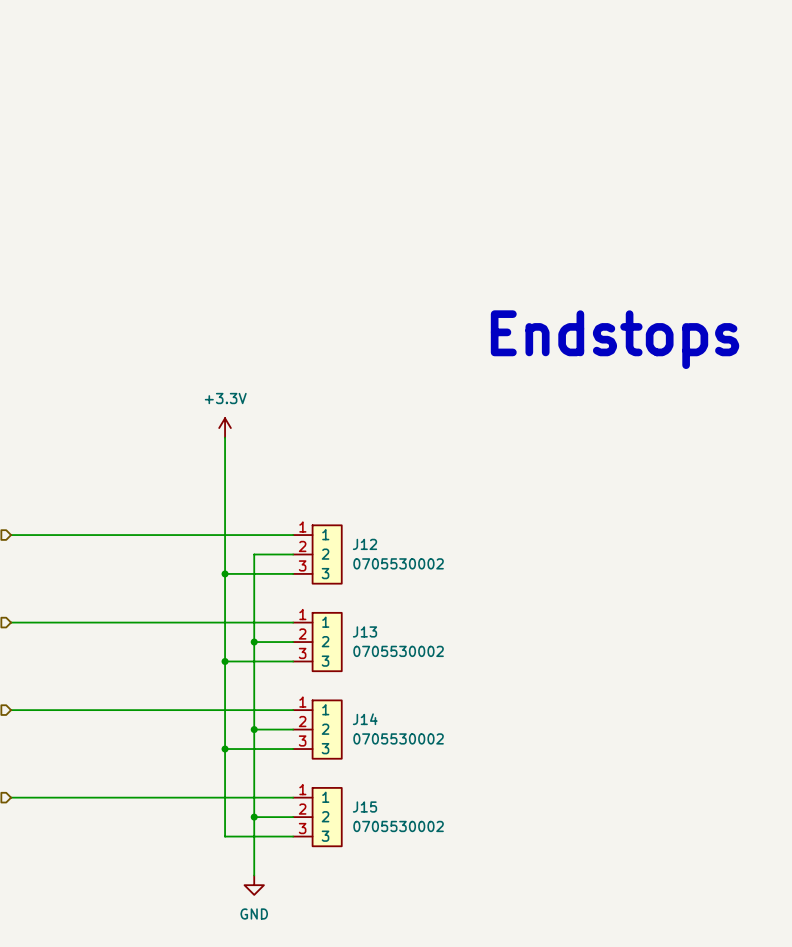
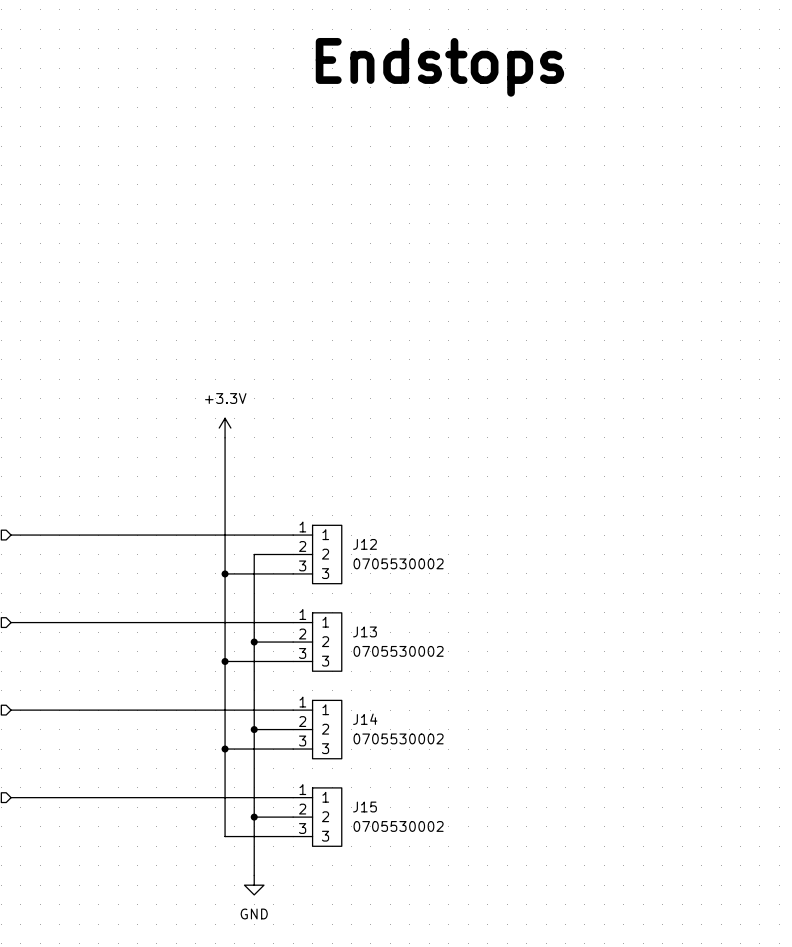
text: none -> Endstops (439, 67)
text: Endstops (615, 339) -> none

